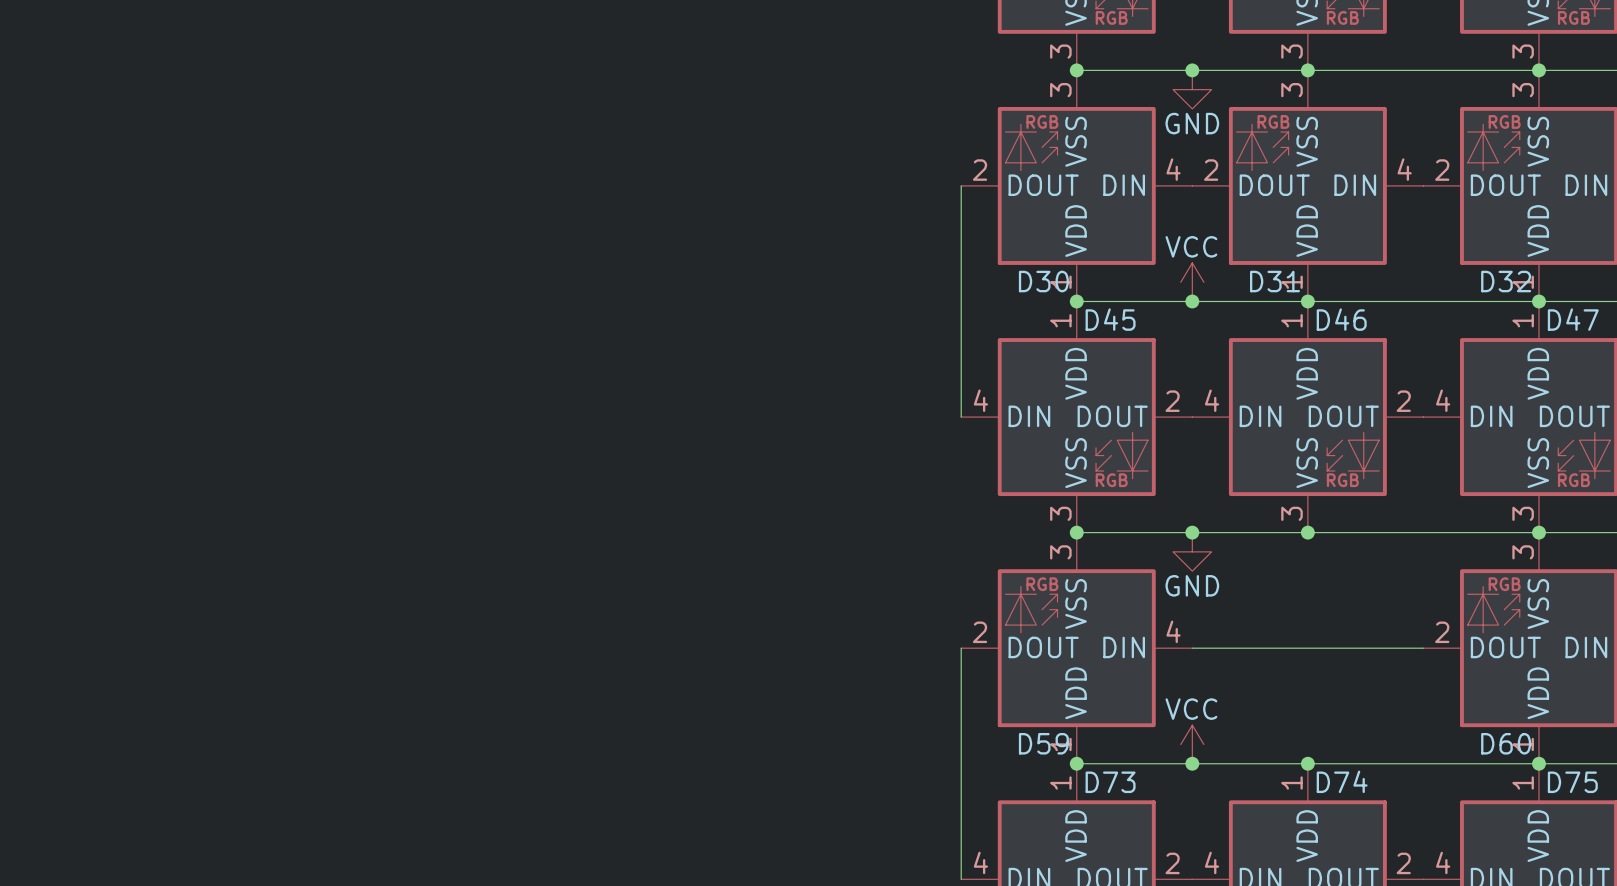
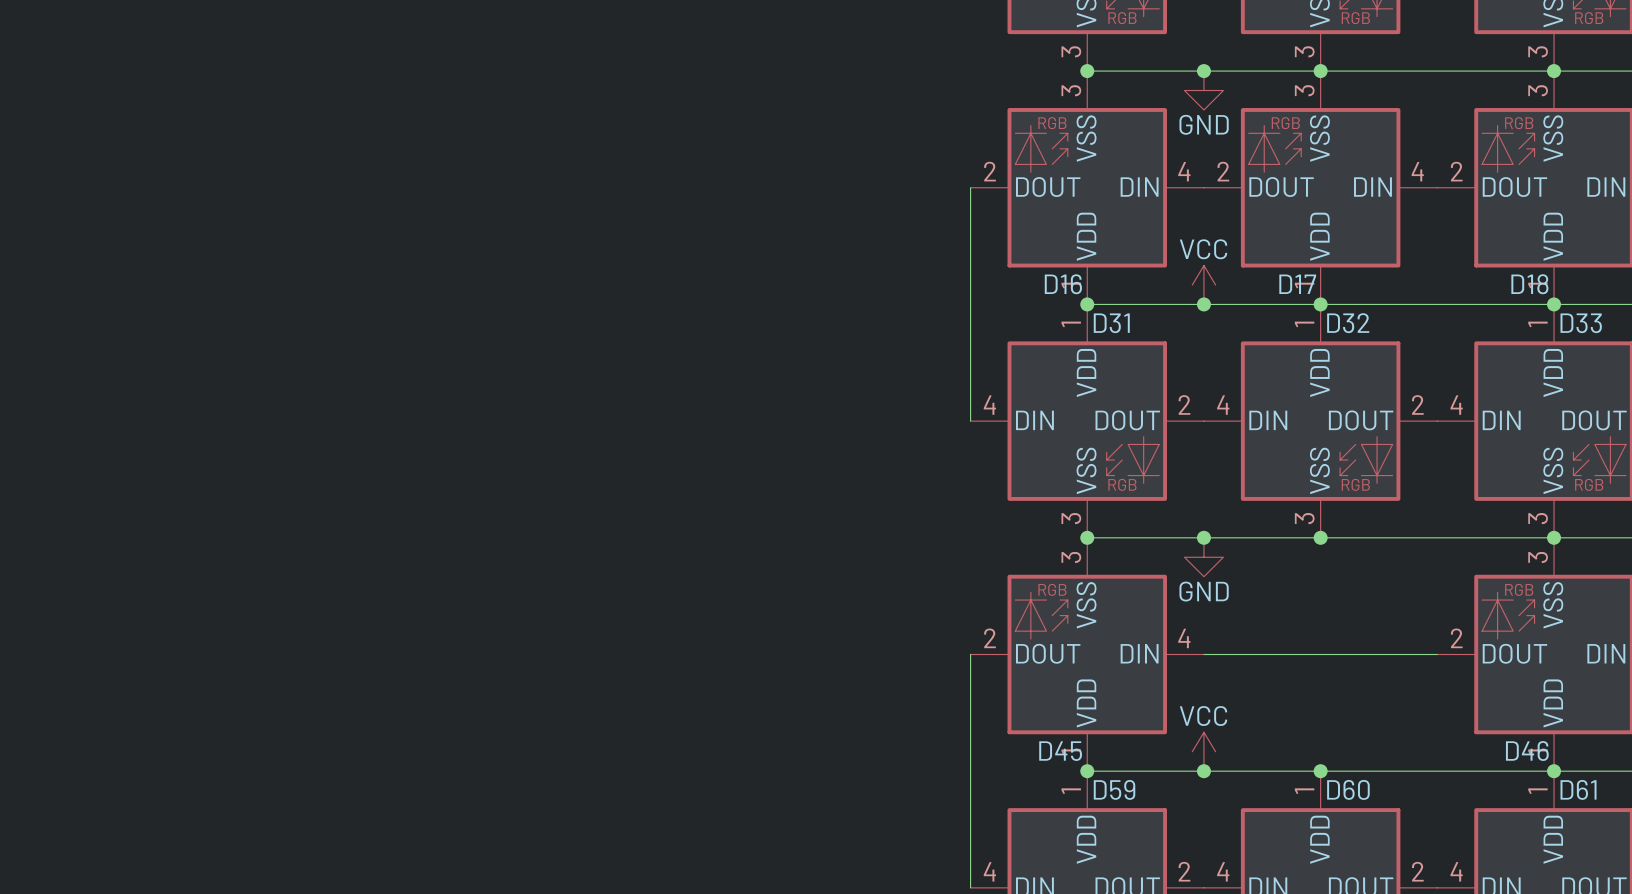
D30 name: D30 (1043, 281) -> D16 (1063, 284)
D31 name: D31 (1275, 281) -> D17 (1297, 284)
D32 name: D32 (1506, 281) -> D18 (1529, 284)
D45 name: D45 (1110, 319) -> D31 (1111, 323)
D46 name: D46 (1341, 319) -> D32 (1348, 323)
D47 name: D47 (1573, 319) -> D33 (1581, 323)
D59 name: D59 (1043, 743) -> D45 (1060, 751)
D60 name: D60 (1506, 743) -> D46 (1527, 751)
D74 name: D74 (1342, 781) -> D60 (1348, 789)
D73 name: D73 (1110, 782) -> D59 (1114, 789)
D75 name: D75 (1572, 782) -> D61 (1578, 789)

